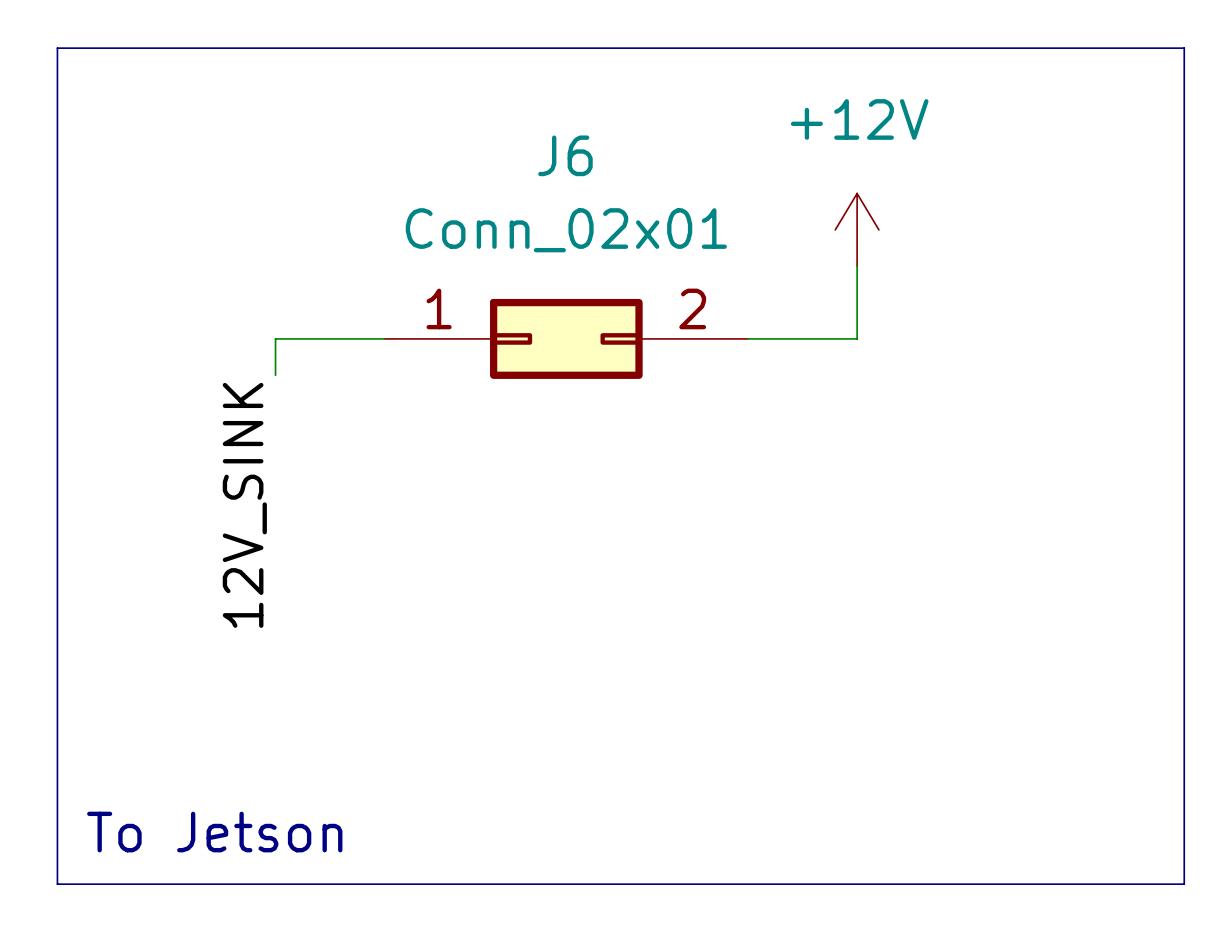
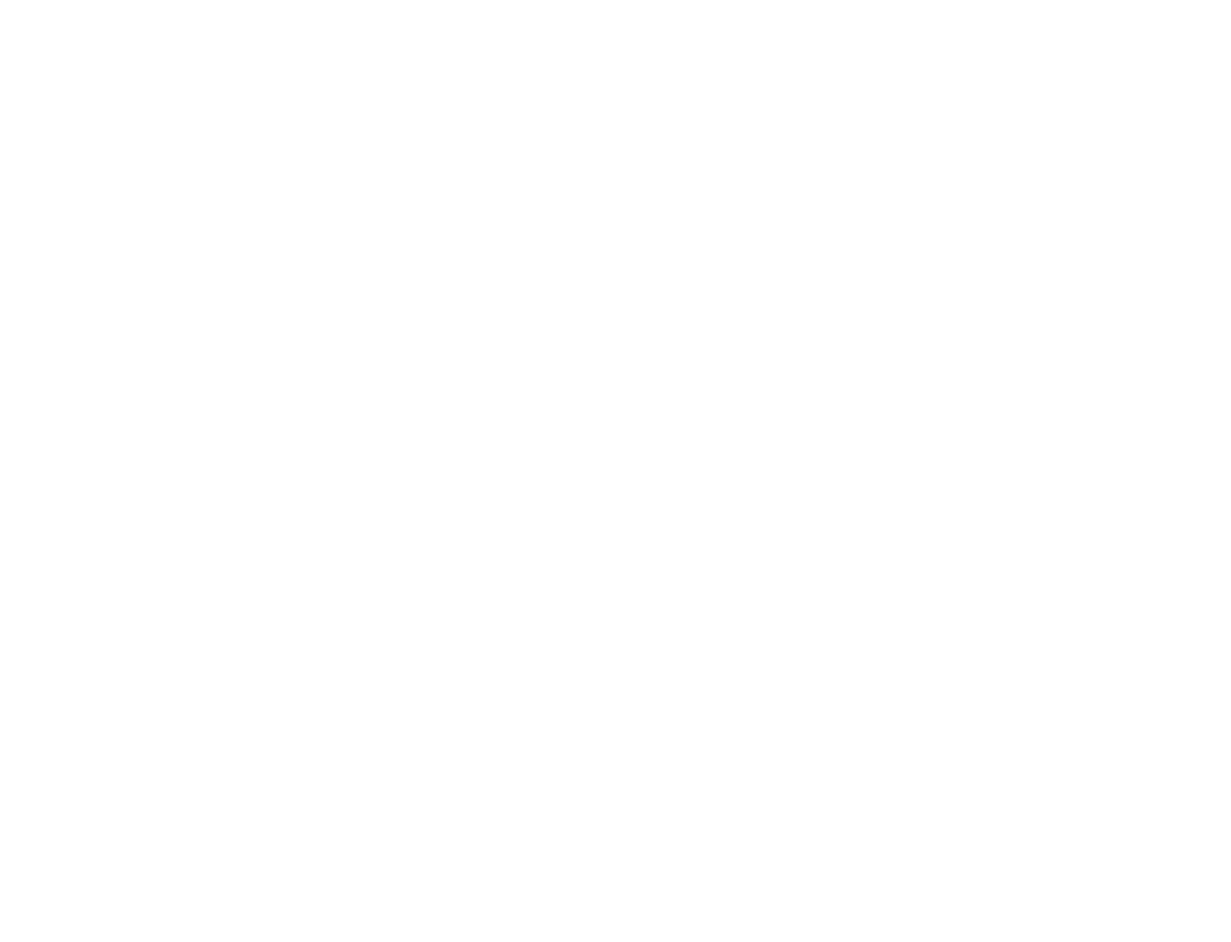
line: (57, 48) (1184, 48) (1184, 884) (57, 884) (57, 48) -> none
power symbol: +12V (857, 229) -> none
wire: (857, 266) (857, 338) (748, 338) -> none
wire: (384, 338) (275, 338) (275, 375) -> none
J6: Conn_02x01 (566, 338) -> none
label: 12V_SINK (244, 505) -> none
text: To Jetson (214, 832) -> none

